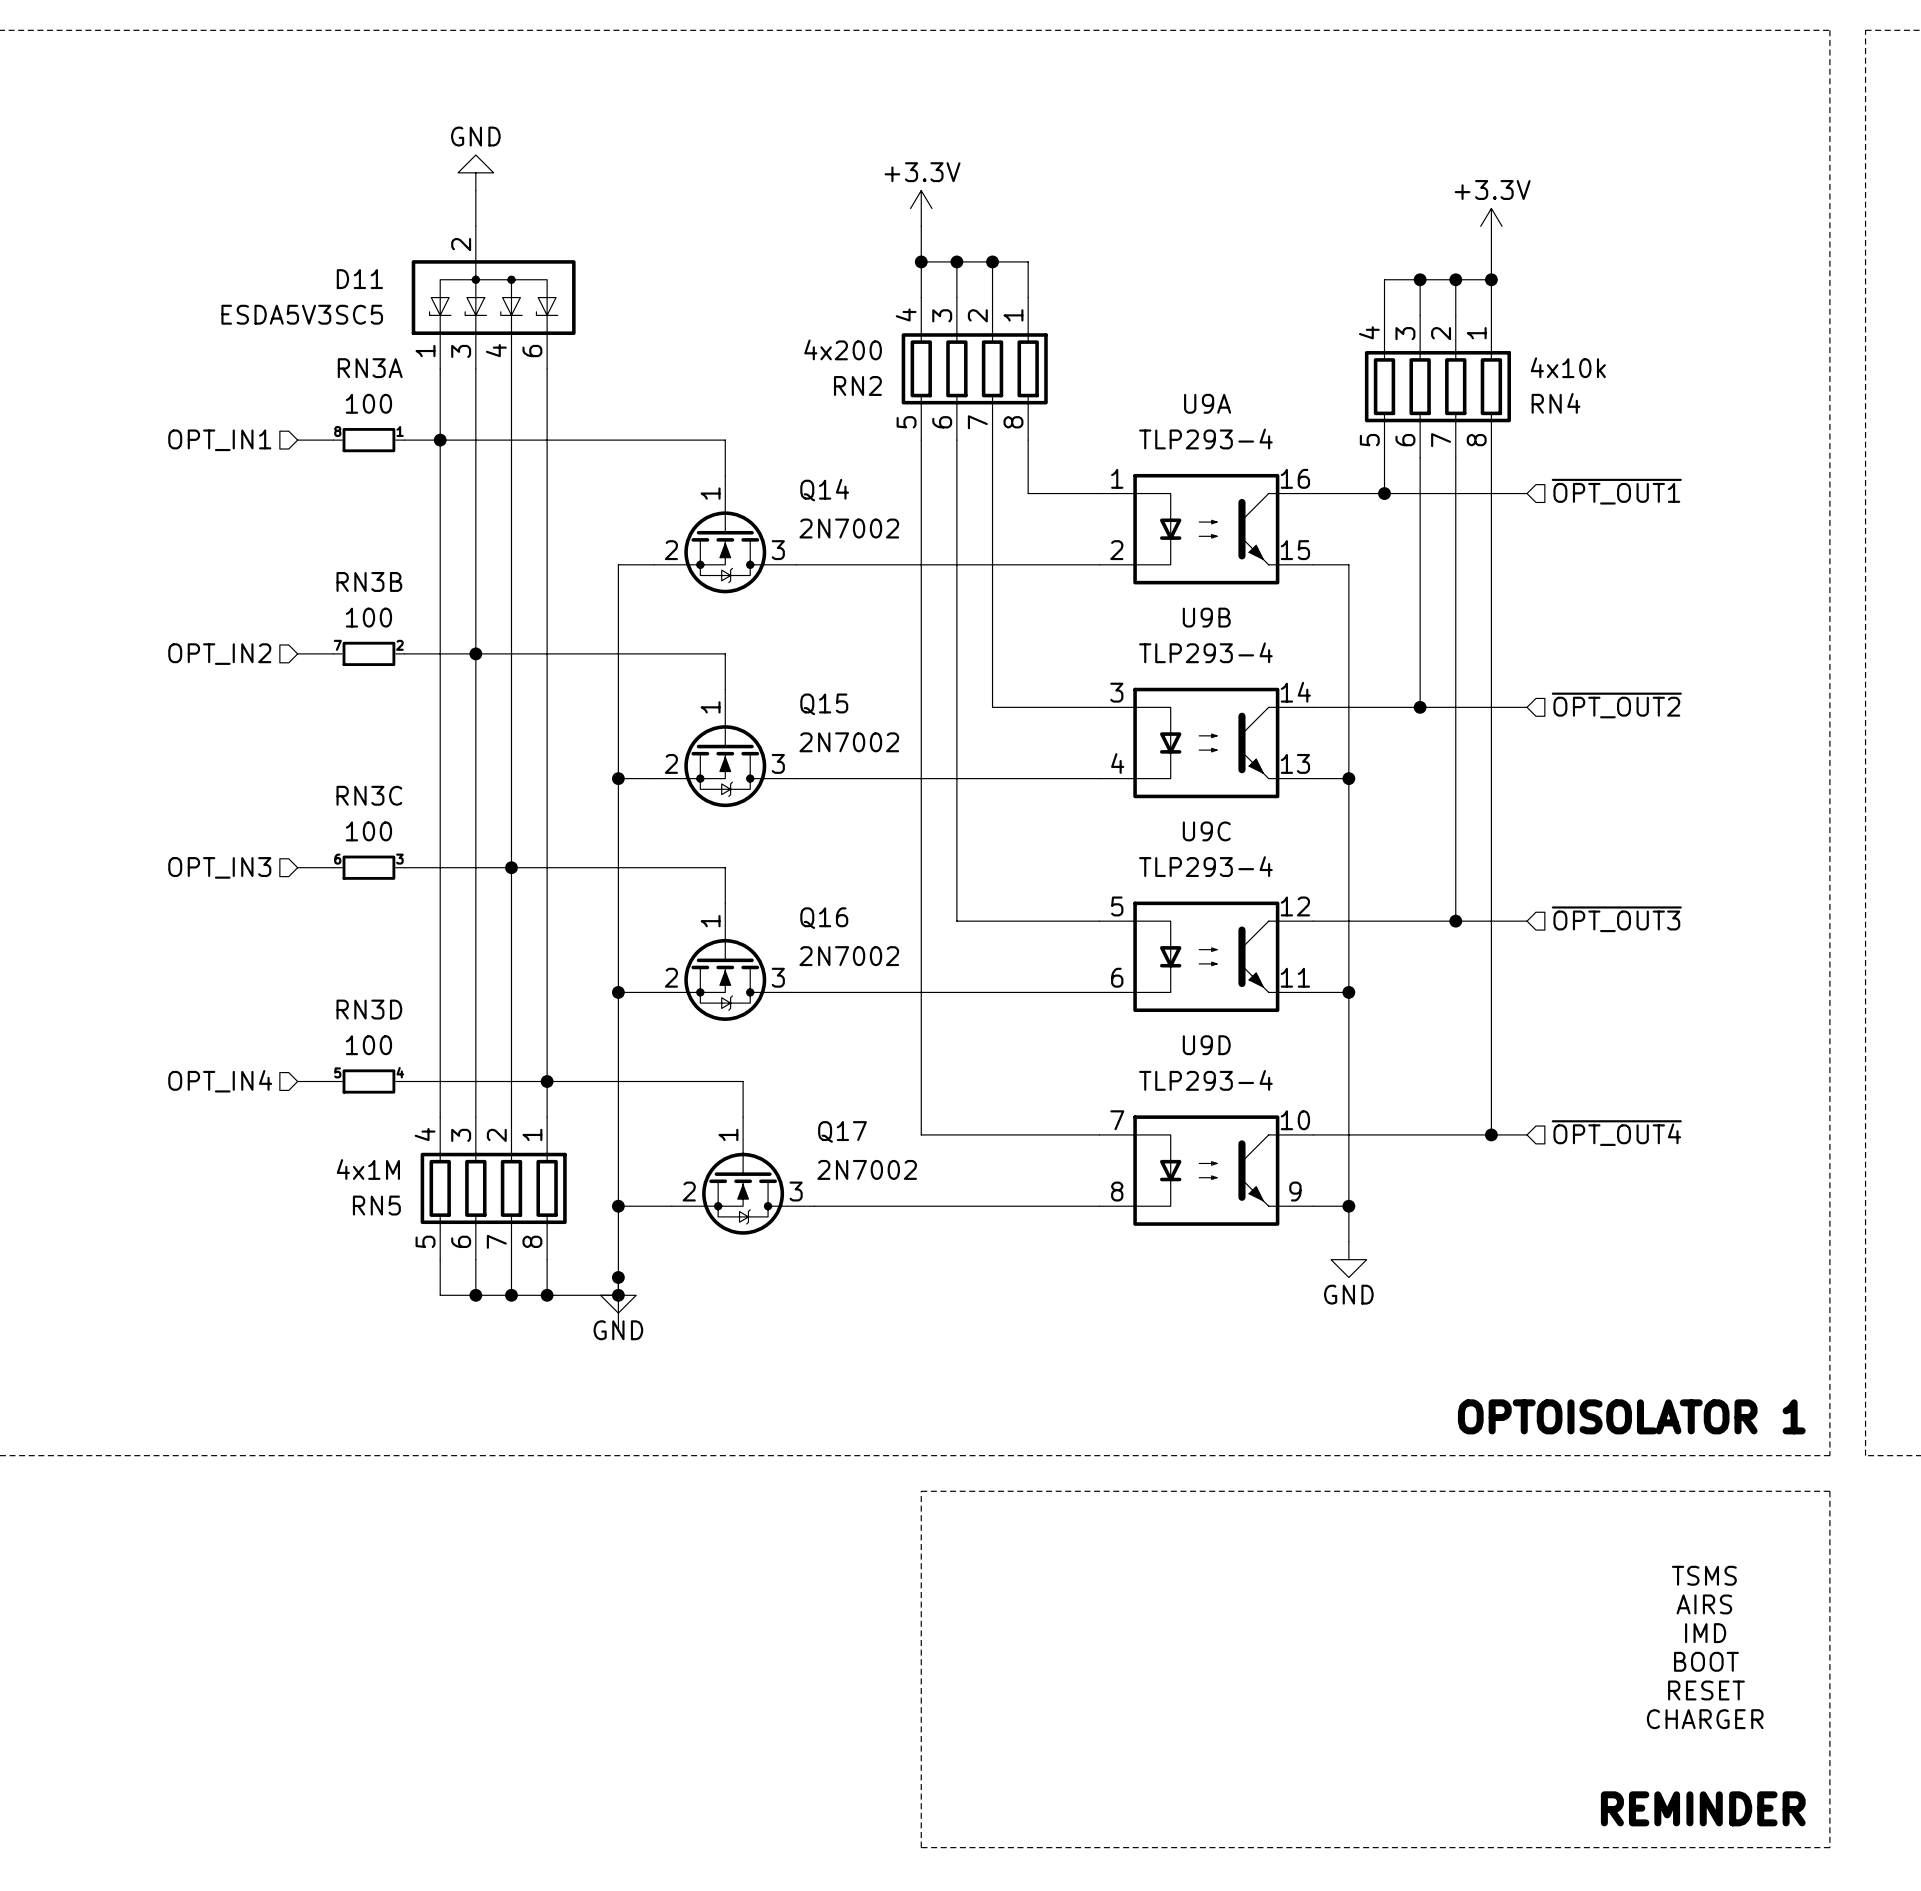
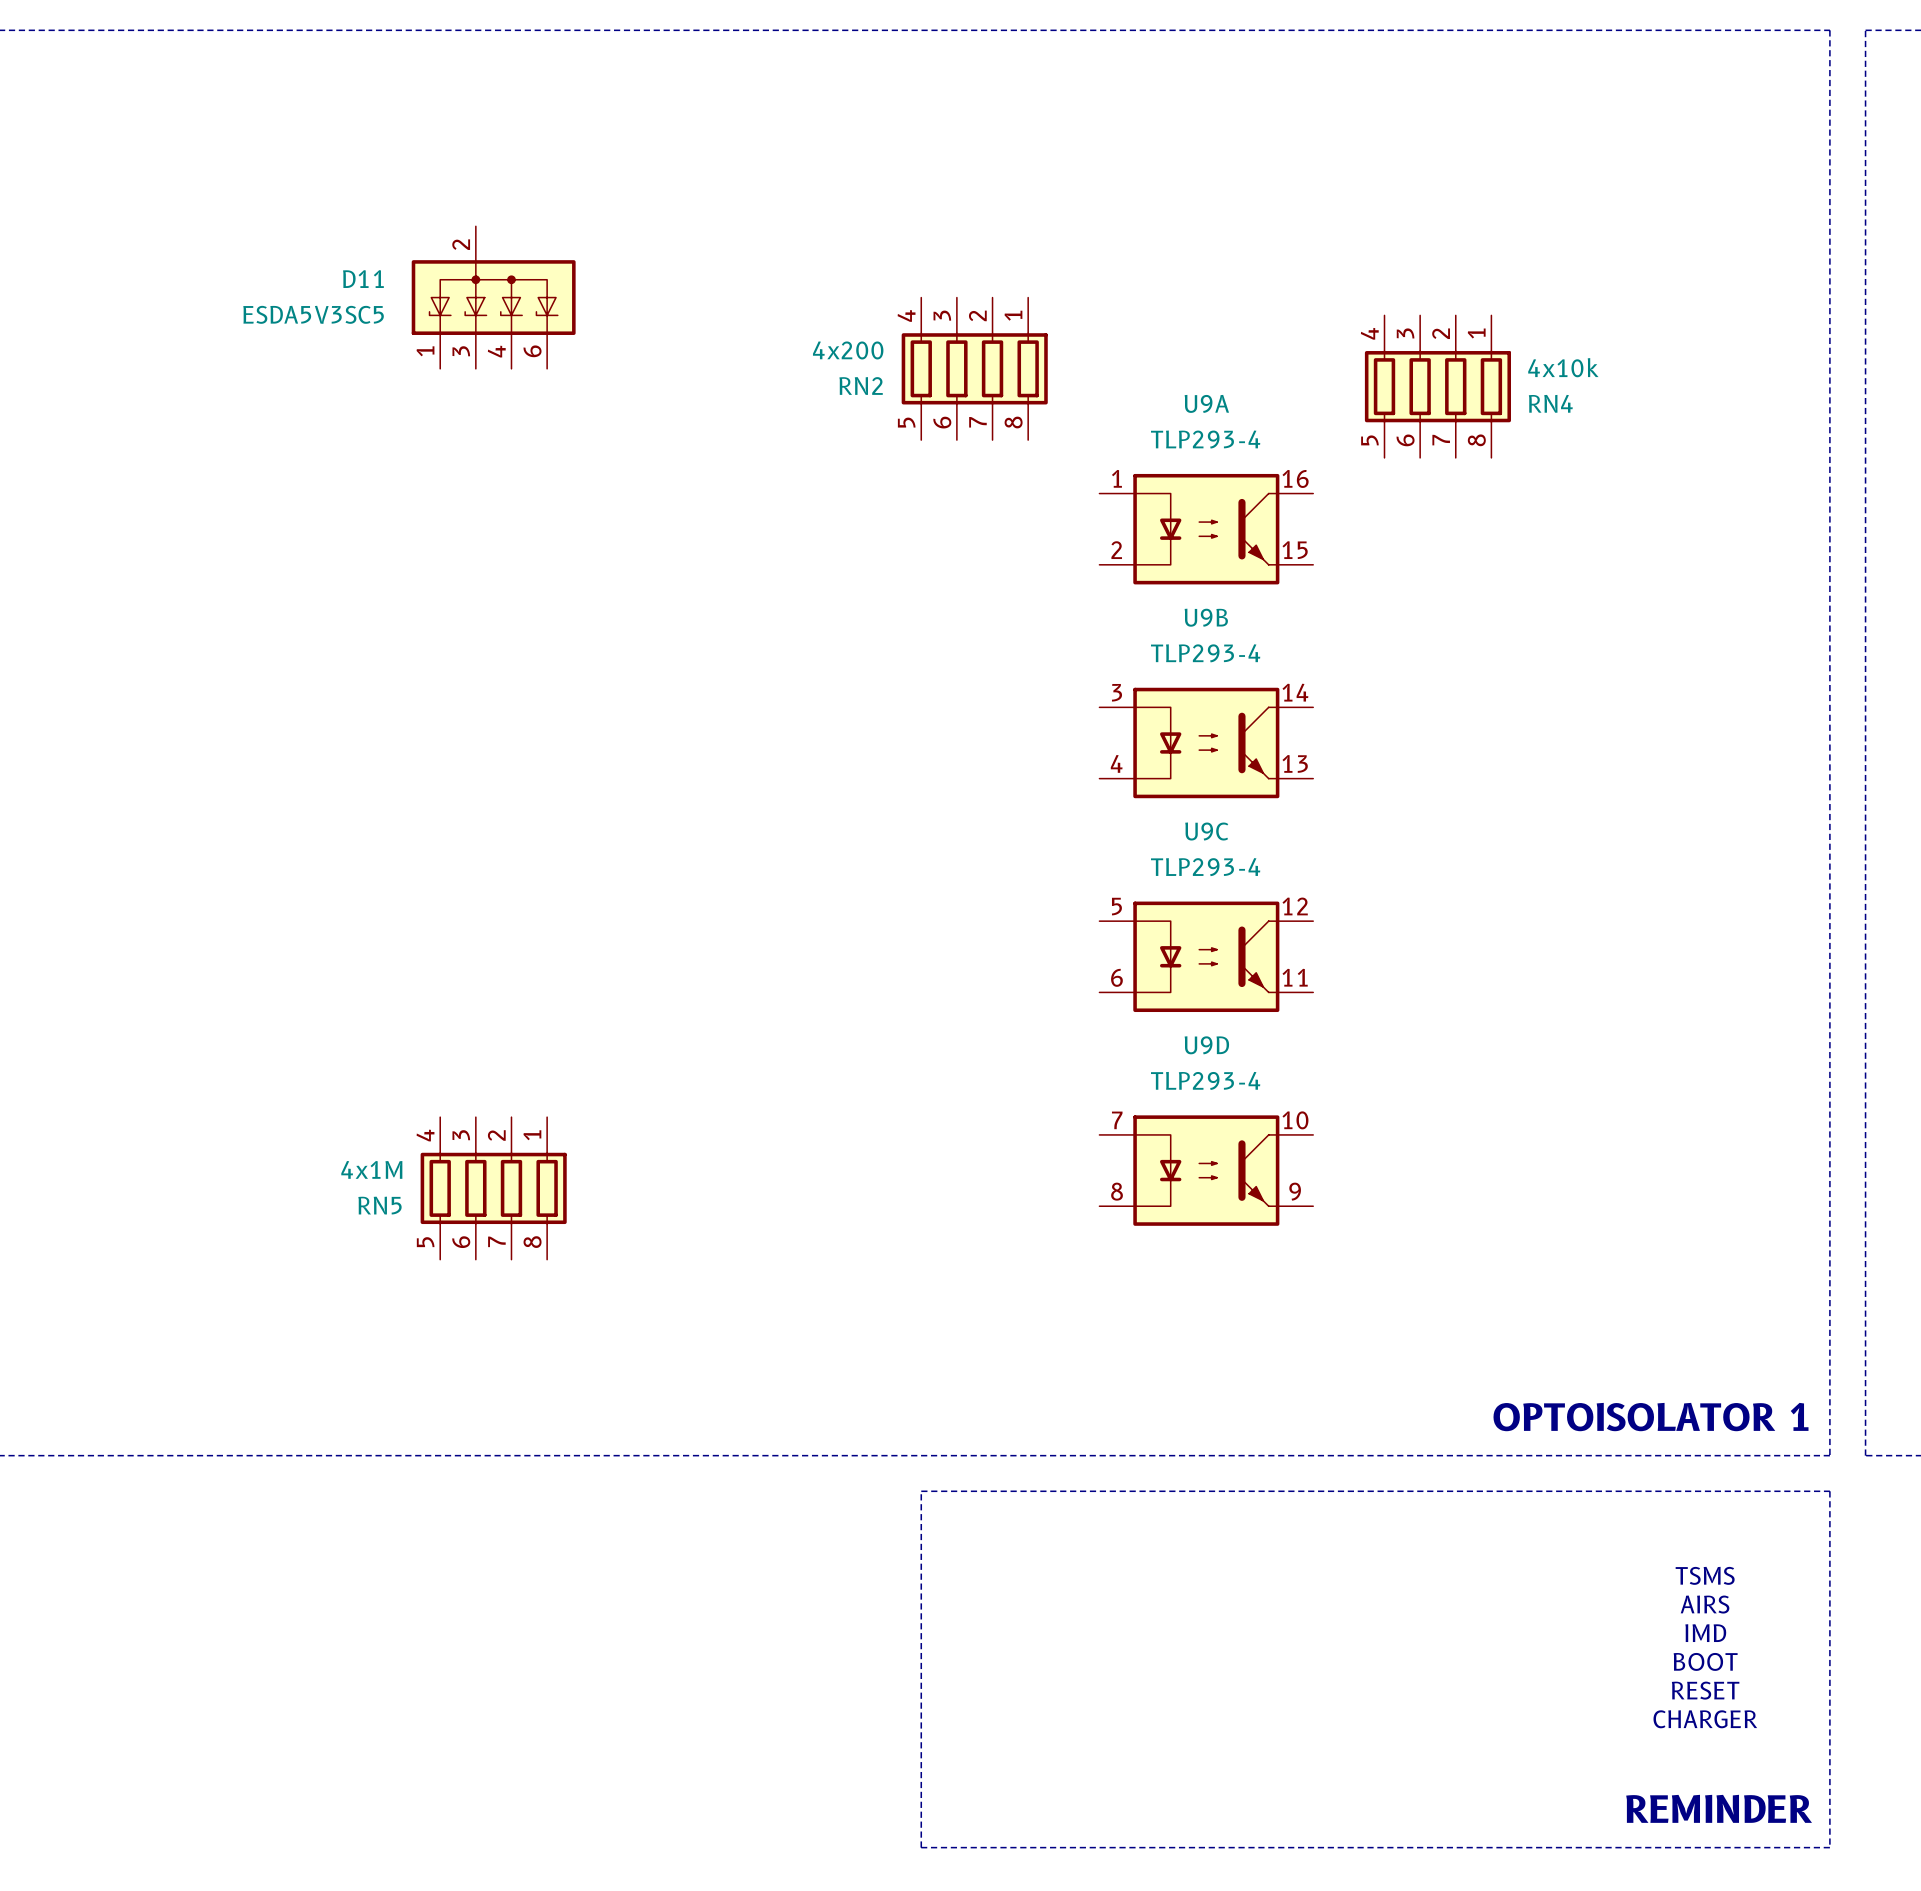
power symbol: GND (475, 172) -> none
wire: (475, 190) (475, 226) -> none
power symbol: +3.3V (921, 208) -> none
wire: (921, 226) (921, 297) -> none
power symbol: +3.3V (1491, 226) -> none
wire: (1491, 244) (1491, 315) -> none
wire: (921, 261) (1028, 261) (1028, 297) -> none
junction: (921, 261) -> none
wire: (956, 261) (956, 297) -> none
junction: (956, 261) -> none
wire: (992, 261) (992, 297) -> none
junction: (992, 261) -> none
wire: (1420, 279) (1420, 315) -> none
junction: (1420, 279) -> none
wire: (1455, 279) (1455, 315) -> none
junction: (1455, 279) -> none
wire: (1491, 279) (1384, 279) (1384, 315) -> none
junction: (1491, 279) -> none
wire: (440, 368) (440, 1117) -> none
wire: (475, 368) (475, 1117) -> none
wire: (511, 368) (511, 1117) -> none
wire: (547, 368) (547, 1117) -> none
hierarchical label: OPT_IN1 (219, 440) -> none
wire: (297, 440) (333, 440) -> none
RN3A: 100 (368, 440) -> none
wire: (404, 440) (725, 440) (725, 475) -> none
junction: (440, 440) -> none
wire: (921, 440) (921, 1134) (1099, 1134) -> none
wire: (956, 440) (956, 921) (1099, 921) -> none
wire: (992, 440) (992, 707) (1099, 707) -> none
wire: (1028, 440) (1028, 493) (1099, 493) -> none
wire: (1384, 457) (1384, 493) -> none
wire: (1420, 457) (1420, 707) -> none
wire: (1455, 457) (1455, 921) -> none
wire: (1491, 457) (1491, 1134) -> none
hierarchical label: ~{OPT_OUT1} (1616, 491) -> none
wire: (1313, 493) (1527, 493) -> none
junction: (1384, 493) -> none
Q14: 2N7002 (725, 534) -> none
wire: (654, 564) (618, 564) (618, 1330) -> none
wire: (796, 564) (1099, 564) -> none
wire: (1313, 564) (1348, 564) (1348, 1241) -> none
wire: (297, 653) (333, 653) -> none
RN3B: 100 (368, 653) -> none
wire: (404, 653) (725, 653) (725, 689) -> none
junction: (475, 653) -> none
hierarchical label: OPT_IN2 (219, 654) -> none
hierarchical label: ~{OPT_OUT2} (1616, 705) -> none
wire: (1313, 707) (1527, 707) -> none
junction: (1420, 707) -> none
Q15: 2N7002 (725, 748) -> none
wire: (618, 778) (654, 778) -> none
junction: (618, 778) -> none
wire: (796, 778) (1099, 778) -> none
wire: (1313, 778) (1348, 778) -> none
junction: (1348, 778) -> none
hierarchical label: OPT_IN3 (219, 867) -> none
wire: (297, 867) (333, 867) -> none
RN3C: 100 (368, 867) -> none
wire: (404, 867) (725, 867) (725, 903) -> none
junction: (511, 867) -> none
hierarchical label: ~{OPT_OUT3} (1616, 919) -> none
wire: (1313, 921) (1527, 921) -> none
junction: (1455, 921) -> none
Q16: 2N7002 (725, 962) -> none
wire: (618, 992) (654, 992) -> none
junction: (618, 992) -> none
wire: (796, 992) (1099, 992) -> none
wire: (1313, 992) (1348, 992) -> none
junction: (1348, 992) -> none
hierarchical label: OPT_IN4 (220, 1081) -> none
wire: (297, 1081) (333, 1081) -> none
RN3D: 100 (368, 1081) -> none
wire: (404, 1081) (743, 1081) (743, 1117) -> none
junction: (547, 1081) -> none
hierarchical label: ~{OPT_OUT4} (1616, 1133) -> none
wire: (1313, 1134) (1527, 1134) -> none
junction: (1491, 1134) -> none
Q17: 2N7002 (743, 1175) -> none
wire: (618, 1206) (671, 1206) -> none
junction: (618, 1206) -> none
wire: (814, 1206) (1099, 1206) -> none
wire: (1313, 1206) (1348, 1206) -> none
junction: (1348, 1206) -> none
wire: (440, 1259) (440, 1295) (618, 1295) -> none
wire: (475, 1259) (475, 1295) -> none
wire: (511, 1259) (511, 1295) -> none
wire: (547, 1259) (547, 1295) -> none
power symbol: GND (1348, 1259) -> none
junction: (618, 1277) -> none
junction: (475, 1295) -> none
junction: (511, 1295) -> none
junction: (547, 1295) -> none
junction: (618, 1295) -> none
power symbol: GND (618, 1295) -> none

